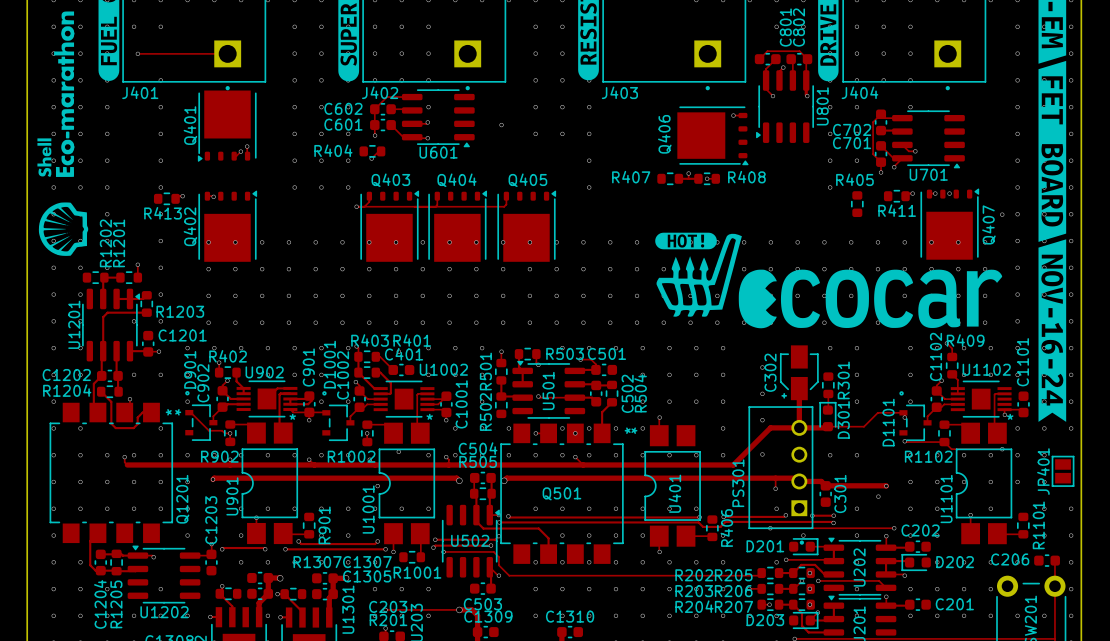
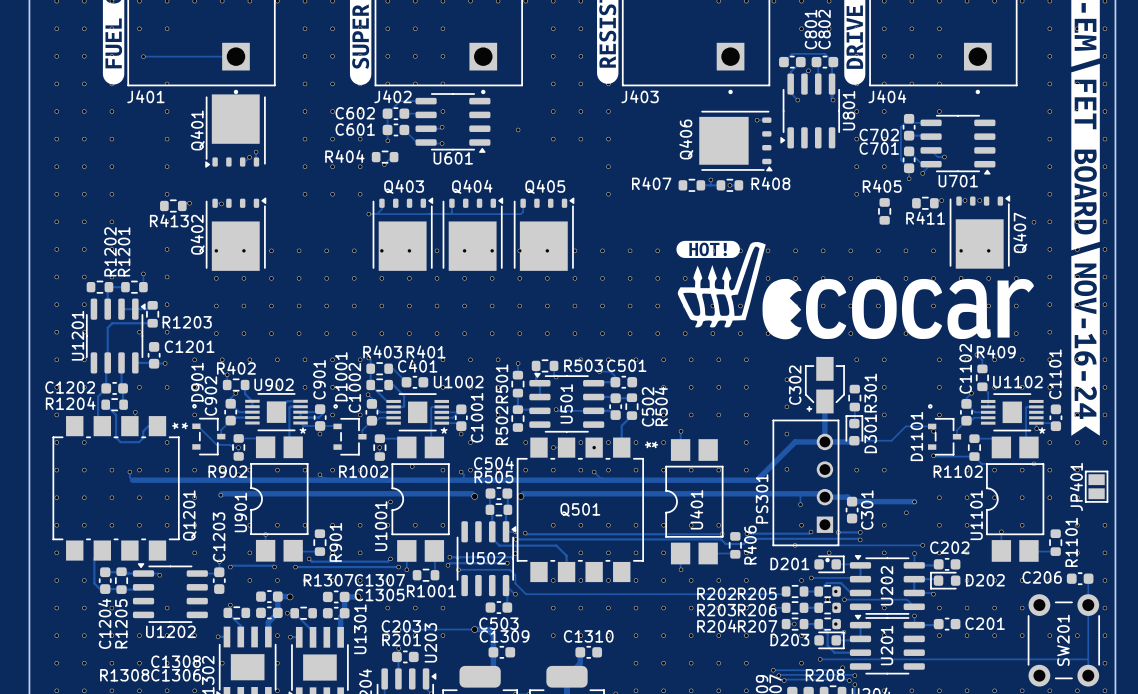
drawing: [37, 11, 89, 256] -> none

